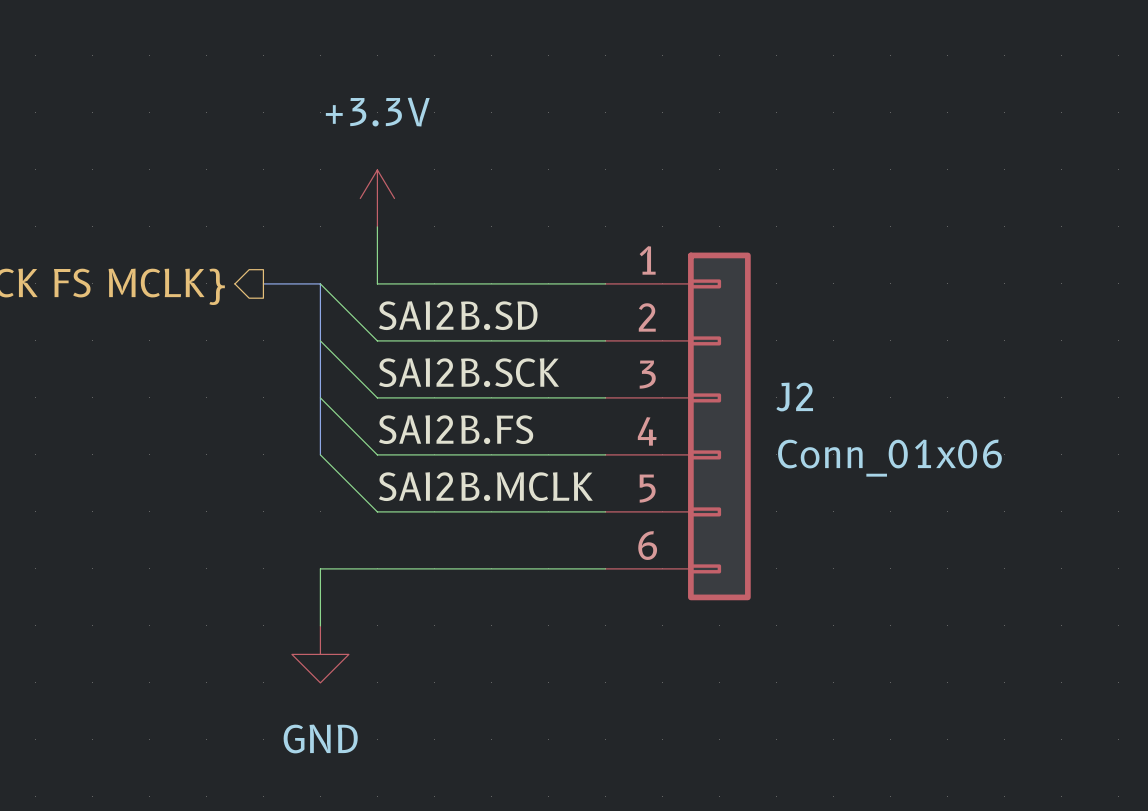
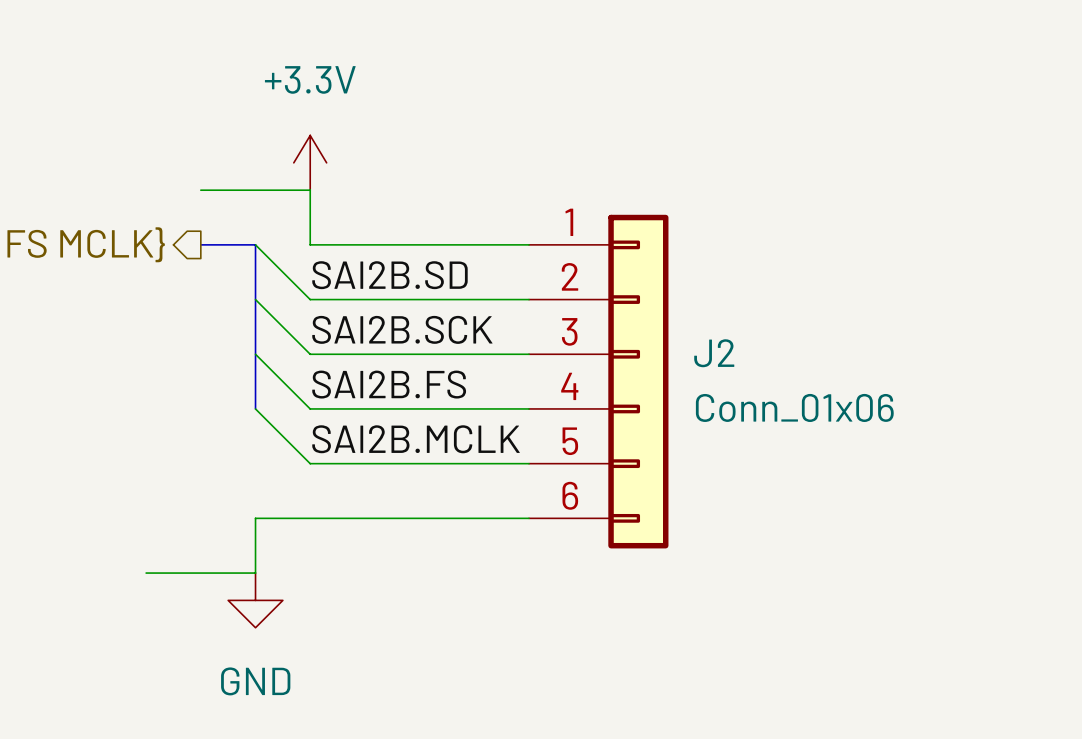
wire: none -> (200, 190) (310, 190)
wire: none -> (146, 573) (255, 573)

